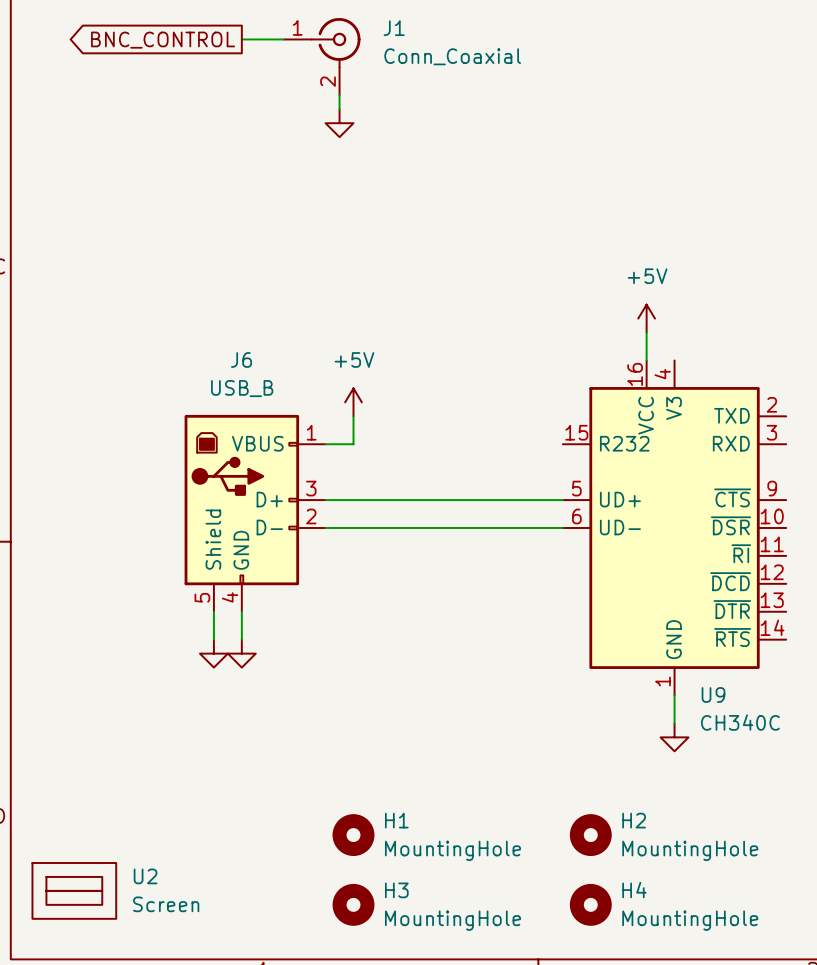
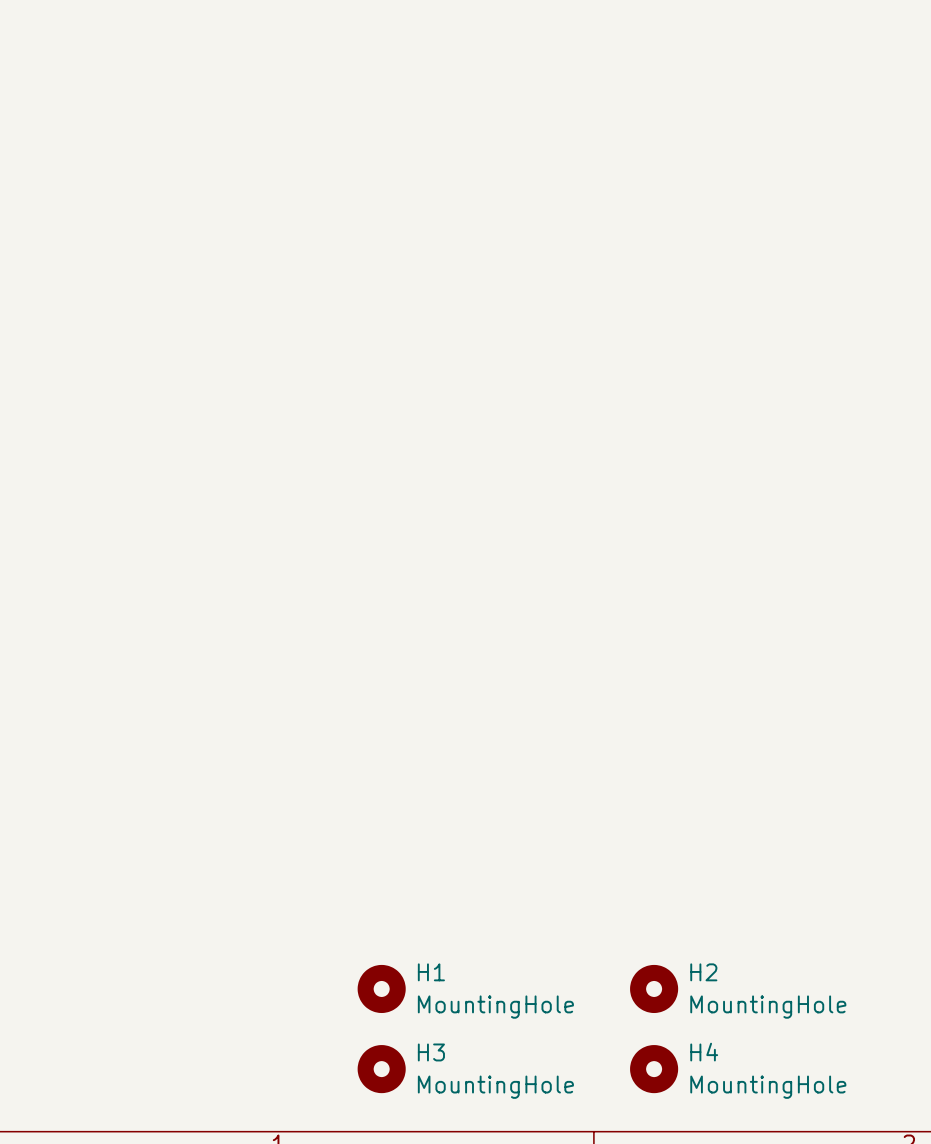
wire: (241, 39) (283, 39) -> none
global label: BNC_CONTROL (163, 40) -> none
J1: Conn_Coaxial (322, 56) -> none
wire: (339, 95) (339, 109) -> none
power symbol: (339, 123) -> none
power symbol: +5V (646, 318) -> none
wire: (646, 332) (646, 360) -> none
power symbol: +5V (353, 402) -> none
wire: (353, 416) (353, 444) (325, 444) -> none
wire: (325, 500) (562, 500) -> none
J6: USB_B (255, 513) -> none
wire: (325, 527) (562, 527) -> none
U9: CH340C (674, 527) -> none
wire: (213, 611) (213, 639) -> none
wire: (241, 611) (241, 639) -> none
power symbol: (213, 653) -> none
power symbol: (241, 653) -> none
wire: (674, 695) (674, 723) -> none
power symbol: (674, 737) -> none
U2: Screen (74, 890) -> none

